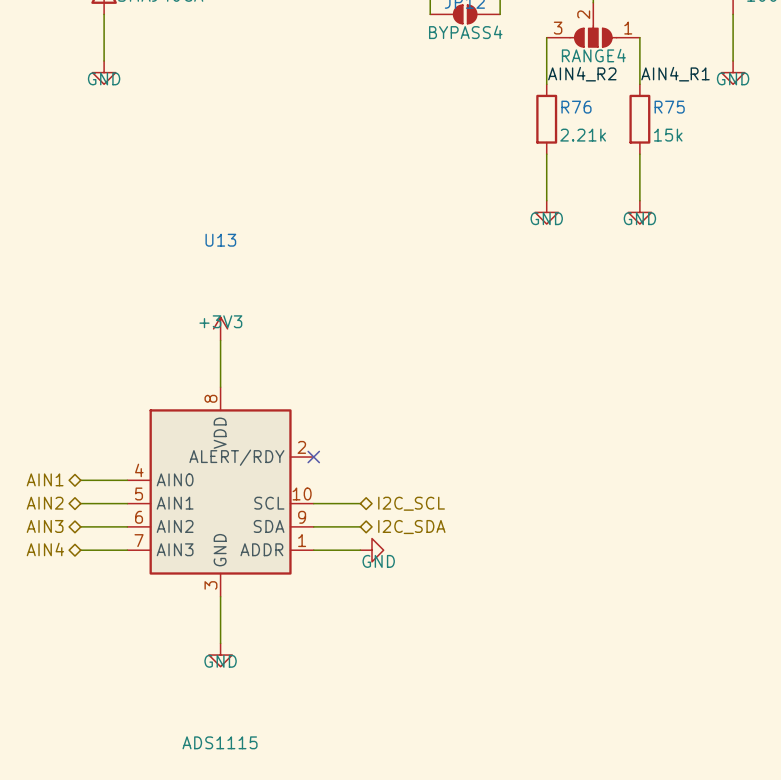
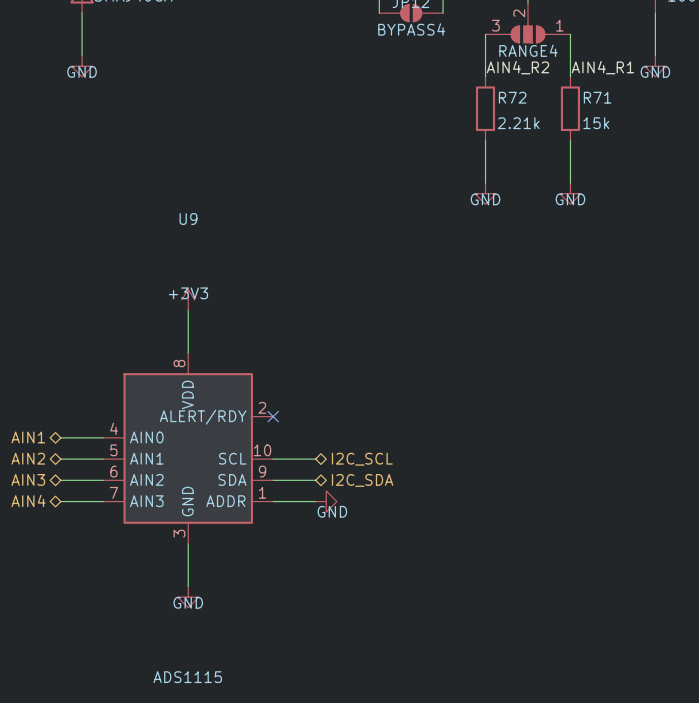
R76 name: R76 (576, 107) -> R72 (512, 97)
R75 name: R75 (669, 107) -> R71 (597, 97)
U13 name: U13 (220, 240) -> U9 (188, 219)

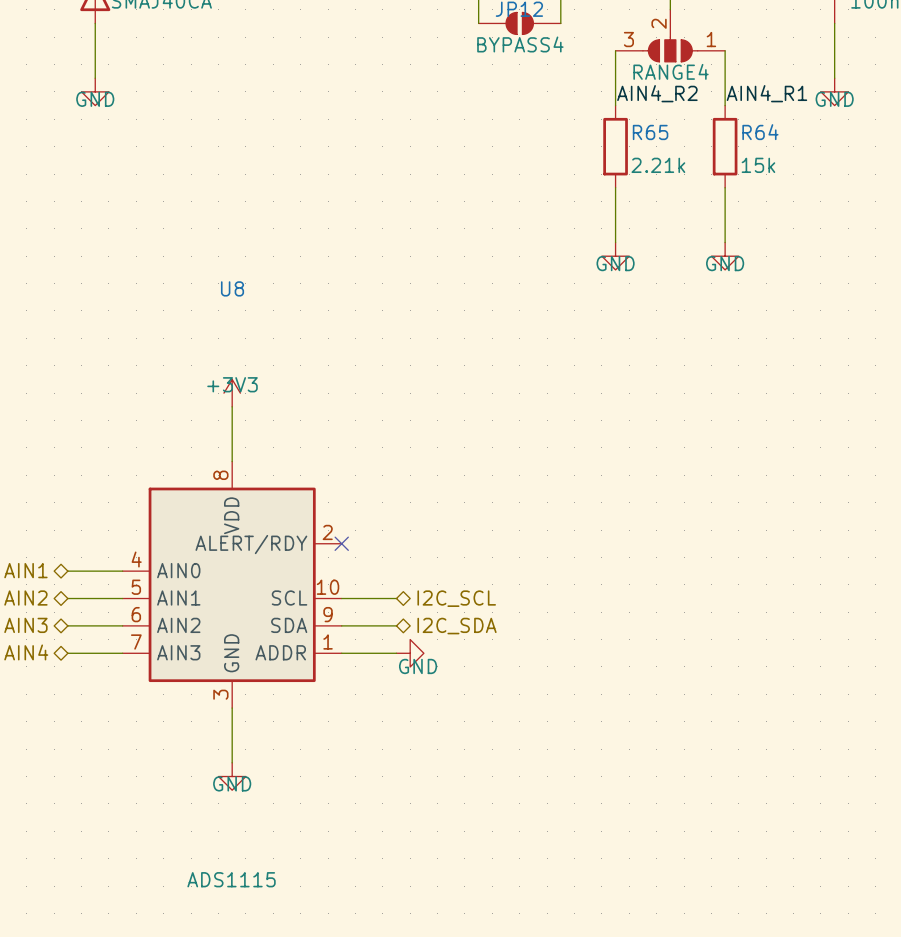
R72 name: R72 (512, 97) -> R65 (650, 132)
R71 name: R71 (597, 97) -> R64 (760, 132)
U9 name: U9 (188, 219) -> U8 (232, 288)

